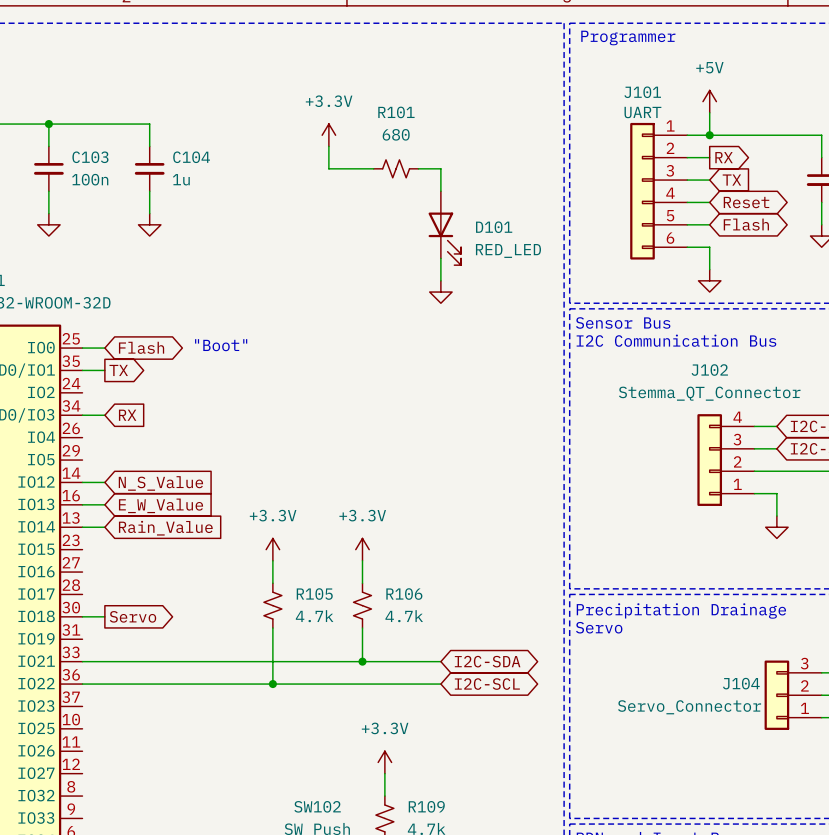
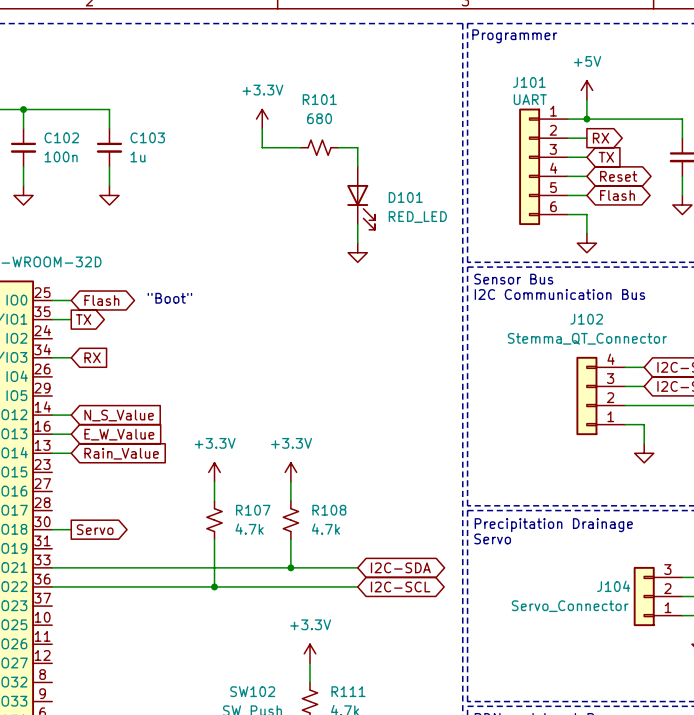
C103 name: C103 (90, 157) -> C102 (61, 137)
C104 name: C104 (191, 157) -> C103 (147, 137)
R105 name: R105 (314, 594) -> R107 (253, 510)
R106 name: R106 (404, 594) -> R108 (329, 510)
R109 name: R109 (426, 806) -> R111 (348, 691)

